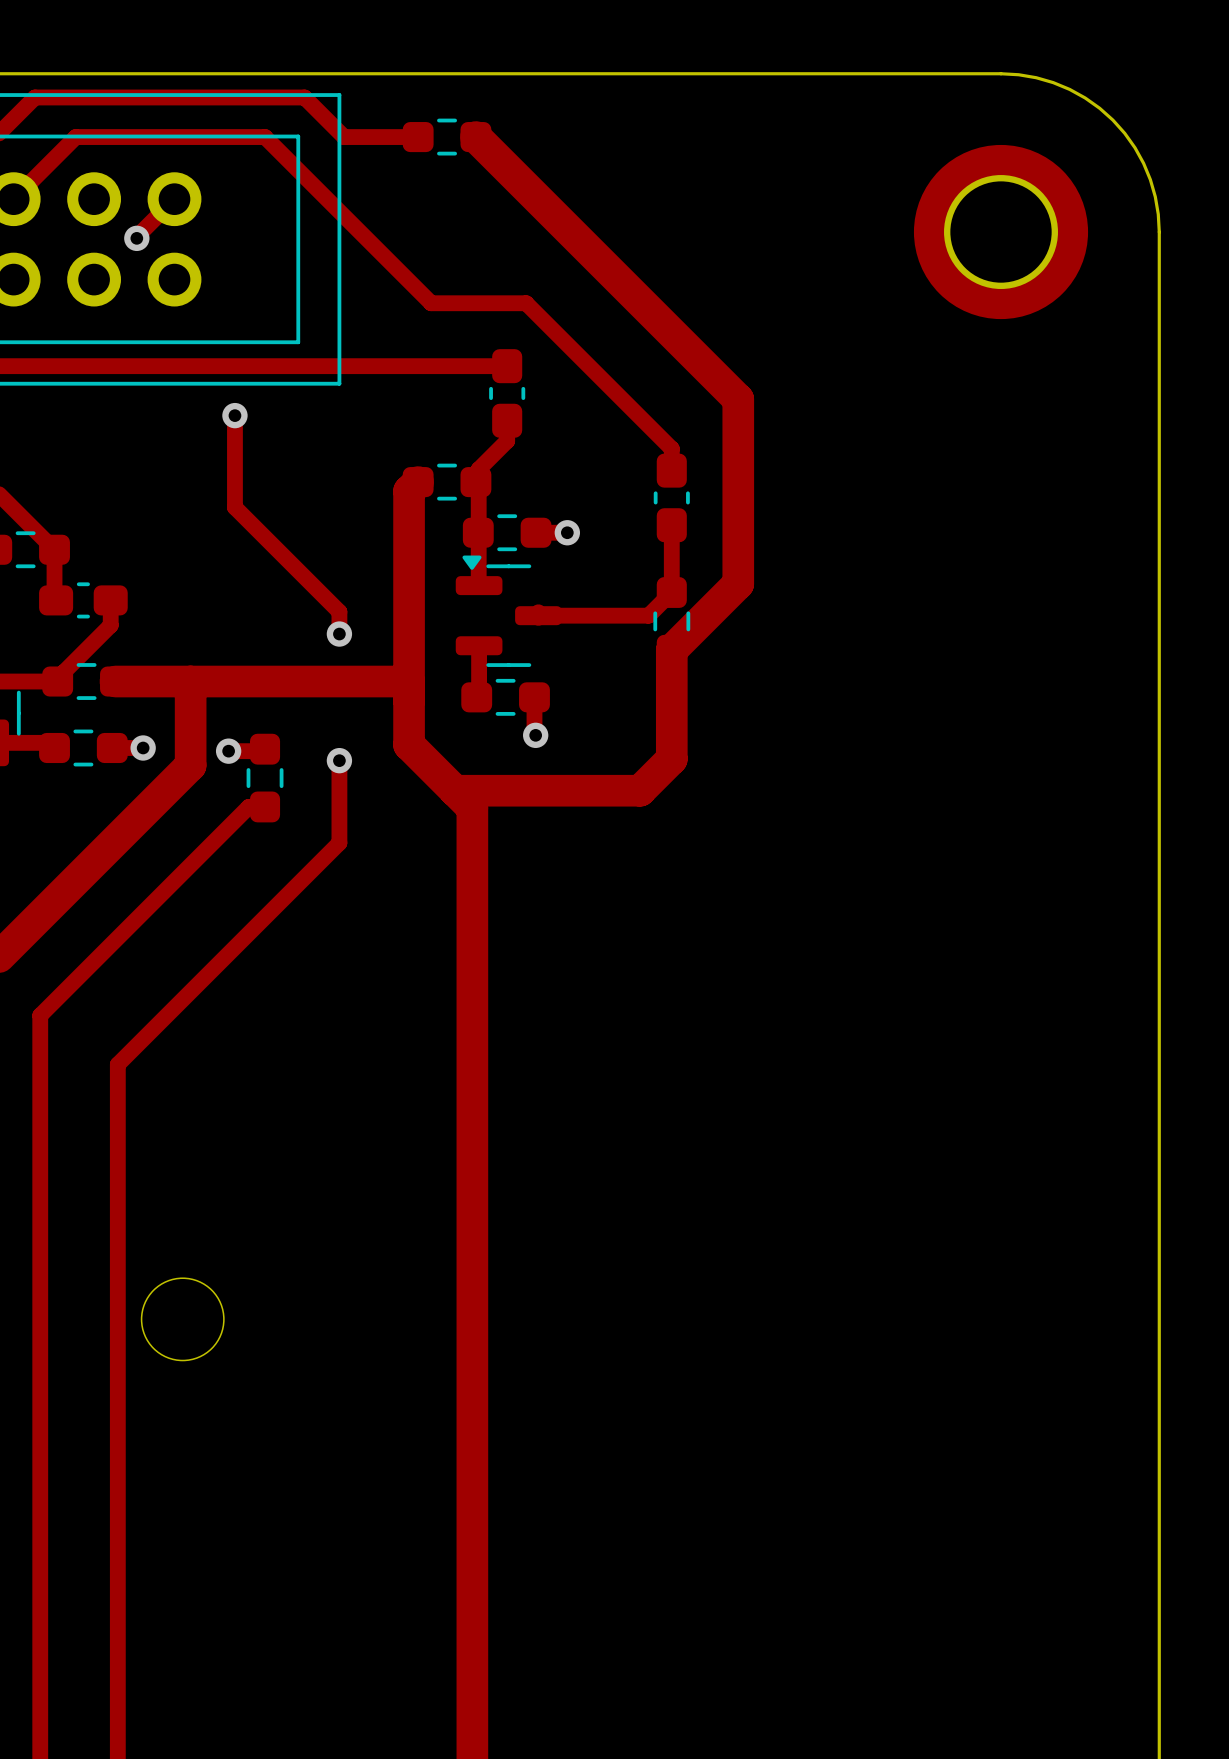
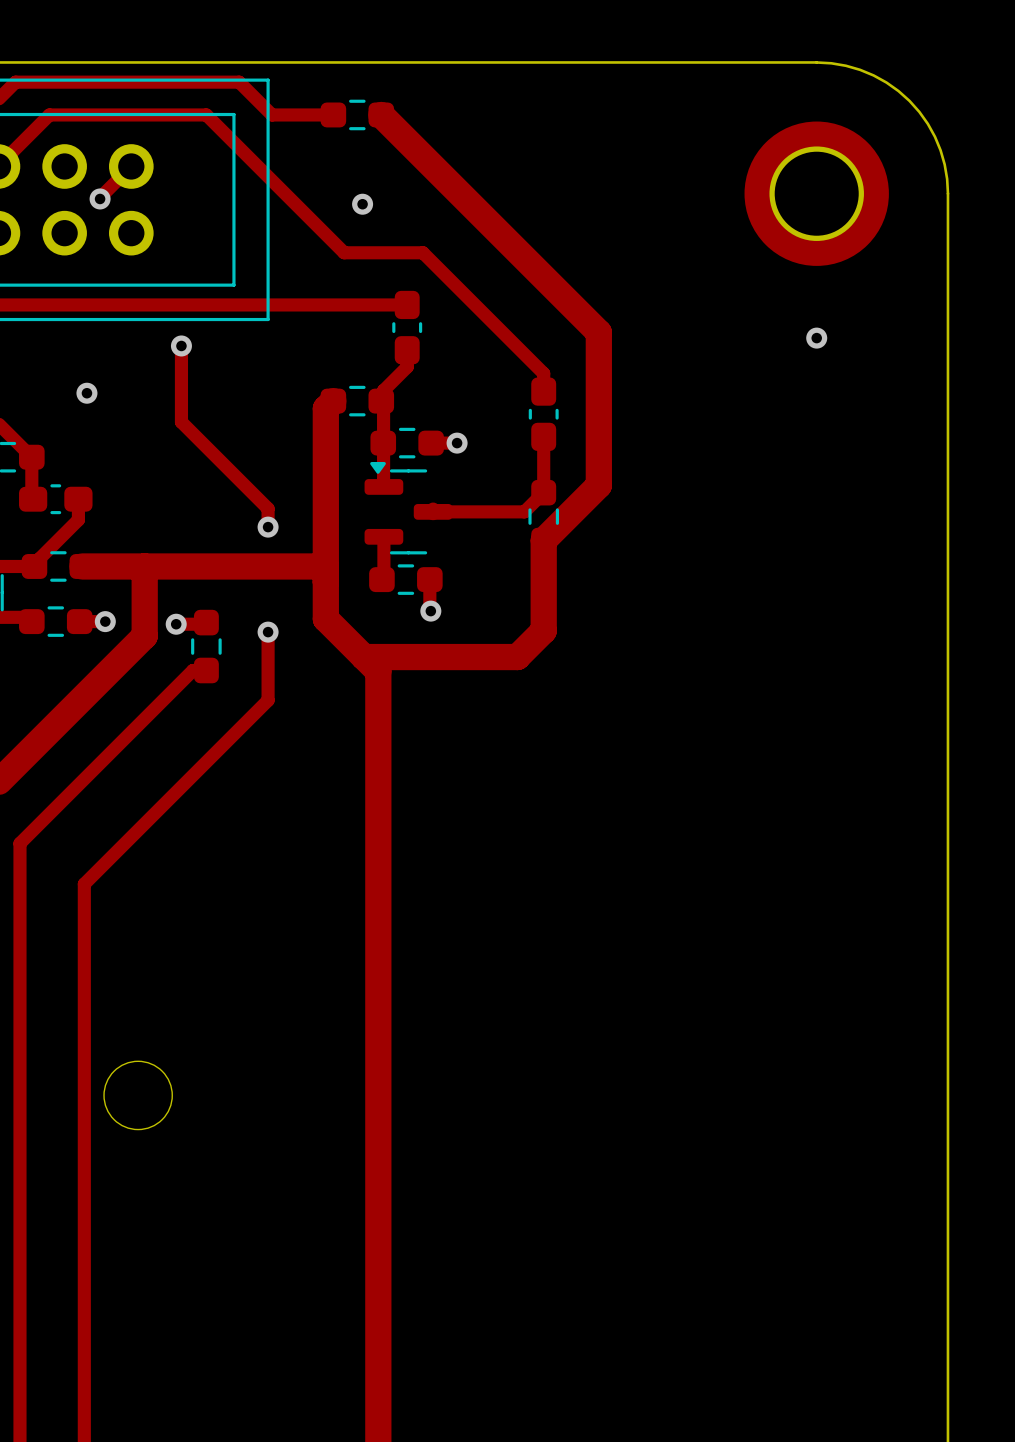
via: none -> (362, 204)
via: none -> (816, 338)
via: none -> (86, 393)

